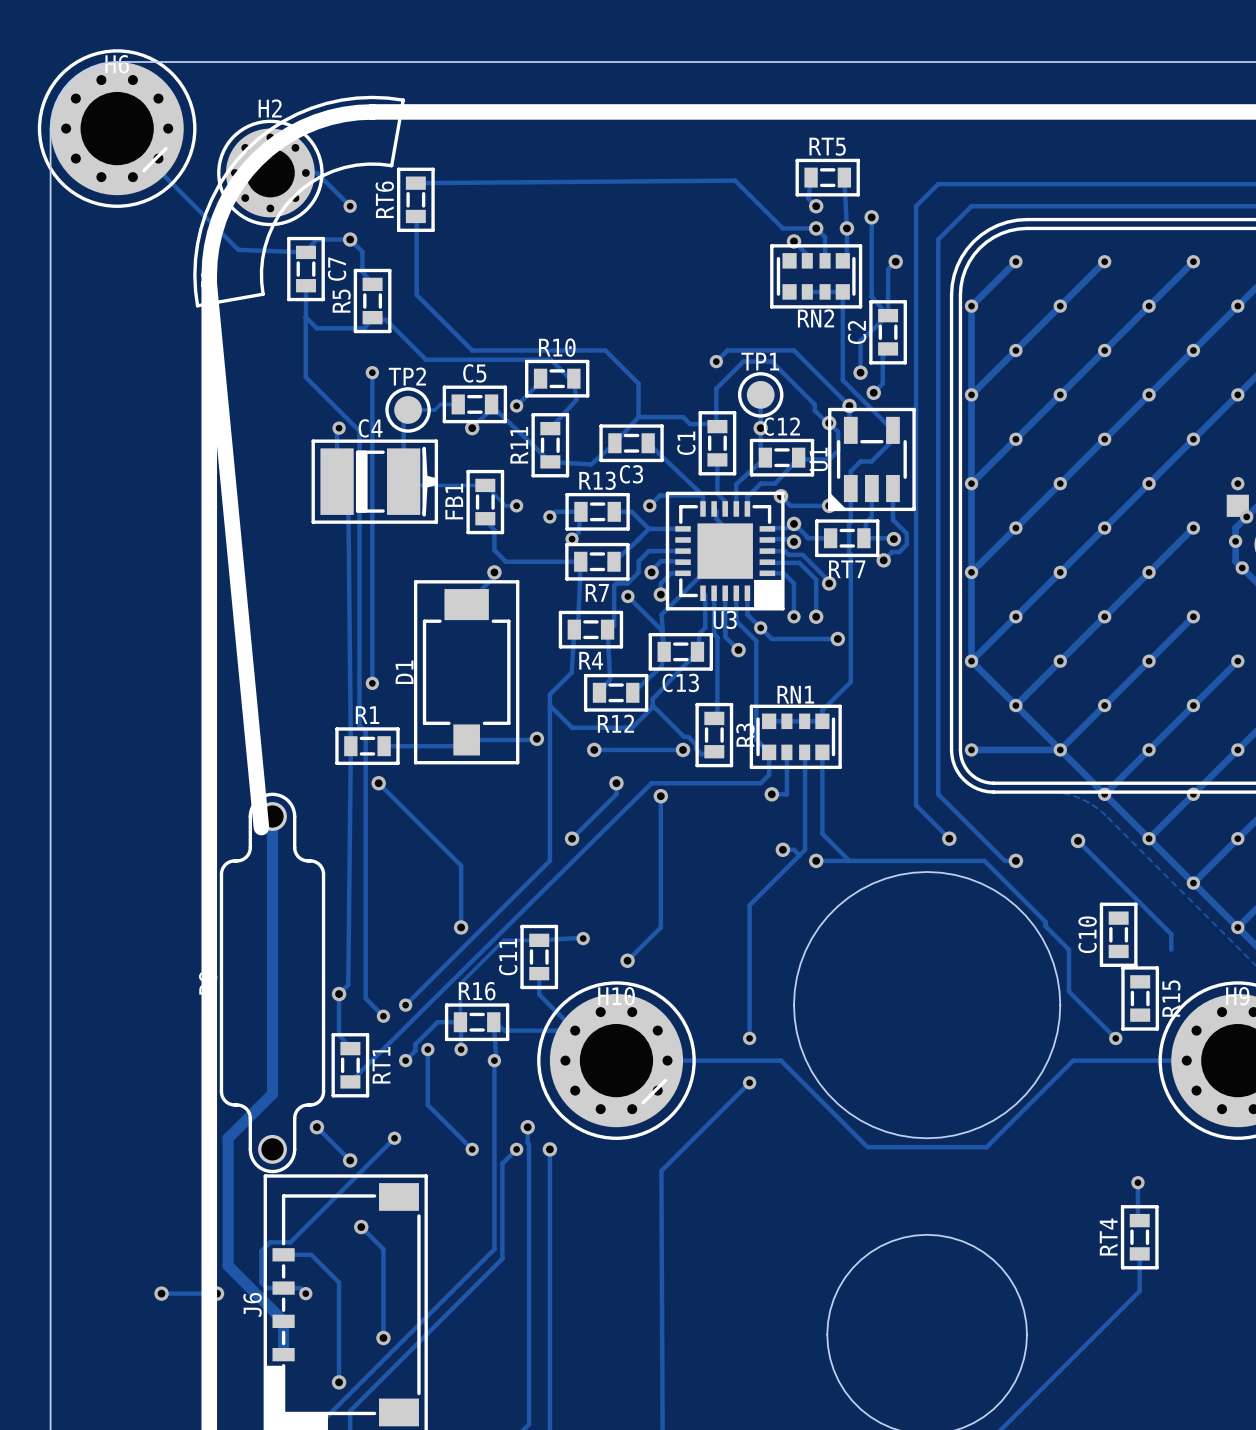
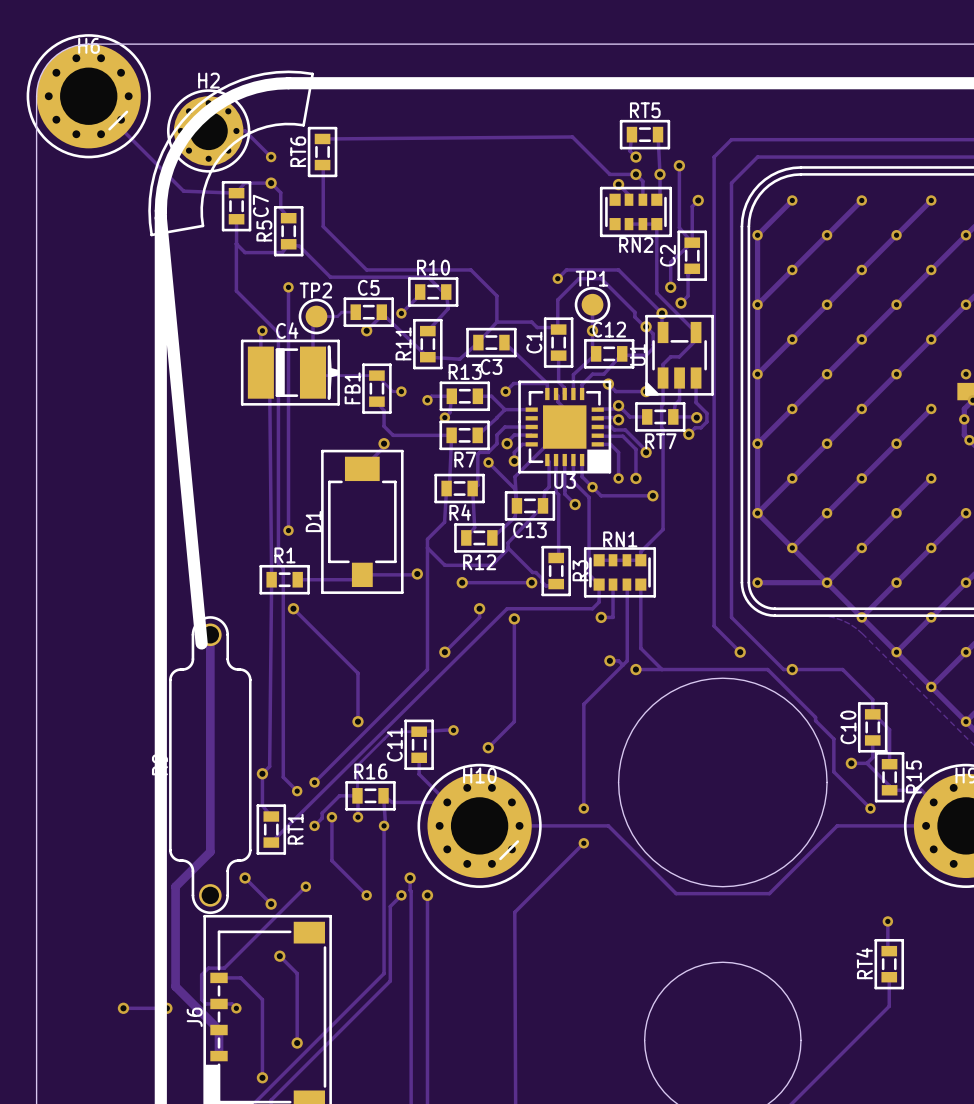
track: (1078, 840) (1171, 934) (1171, 949) -> none
via: (1078, 840) -> none
track: none -> (792, 669) (842, 669) (872, 699) (872, 714)
track: none -> (872, 712) (889, 729) (889, 764)
track: none -> (872, 740) (872, 757) (867, 763)
track: none -> (851, 763) (867, 763)
via: none -> (851, 763)
track: none -> (867, 763) (889, 785) (889, 790) (921, 790) (933, 802)

